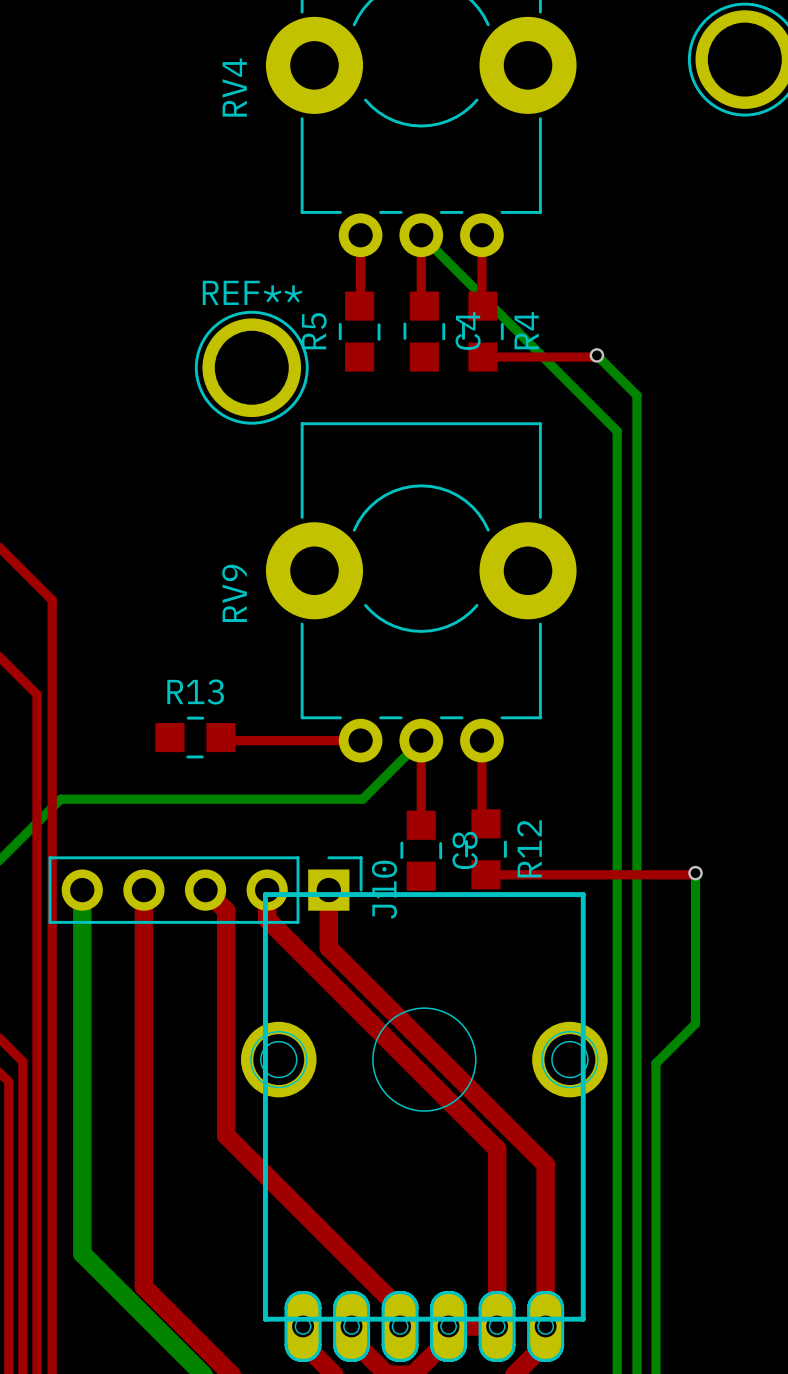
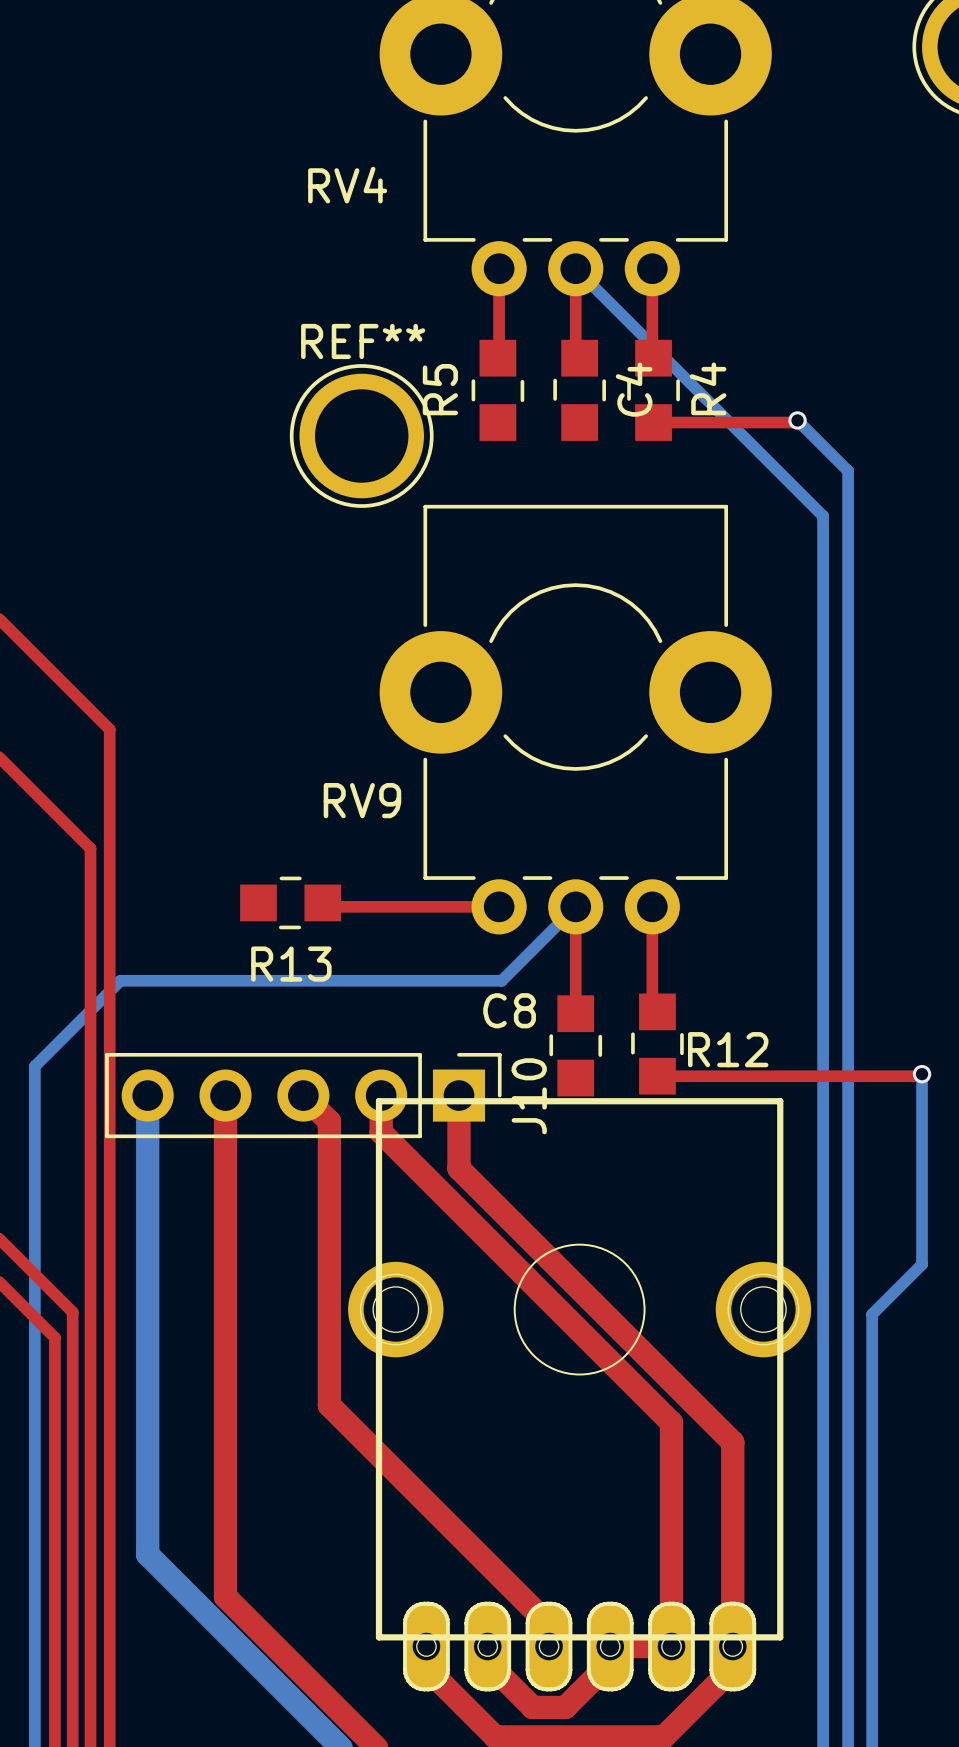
RV4 name rotation: 0° (234, 87) -> 90° clockwise (347, 185)
RV9 name rotation: 0° (234, 593) -> 90° clockwise (362, 800)
R13 name position: R13 (195, 691) -> R13 (291, 964)
R12 name rotation: 0° (529, 848) -> 90° clockwise (728, 1049)
C8 name rotation: 0° (465, 850) -> 90° clockwise (509, 1010)
C8 name position: C8 (465, 850) -> C8 (509, 1010)

